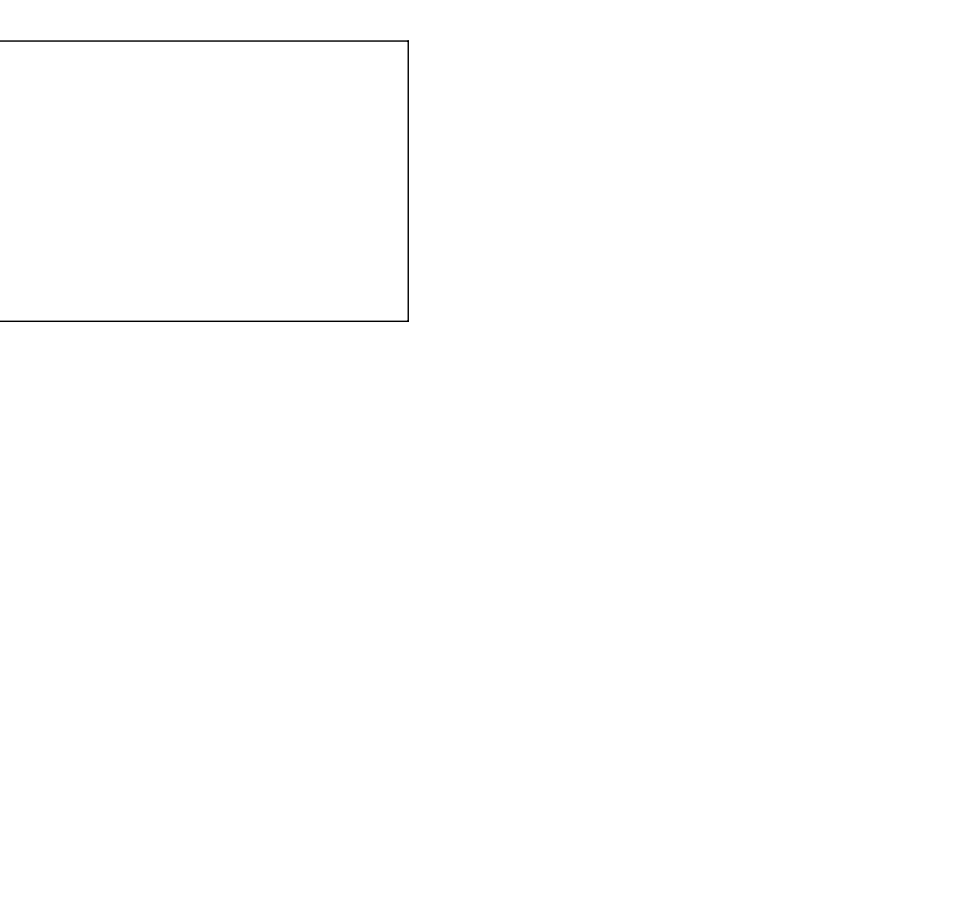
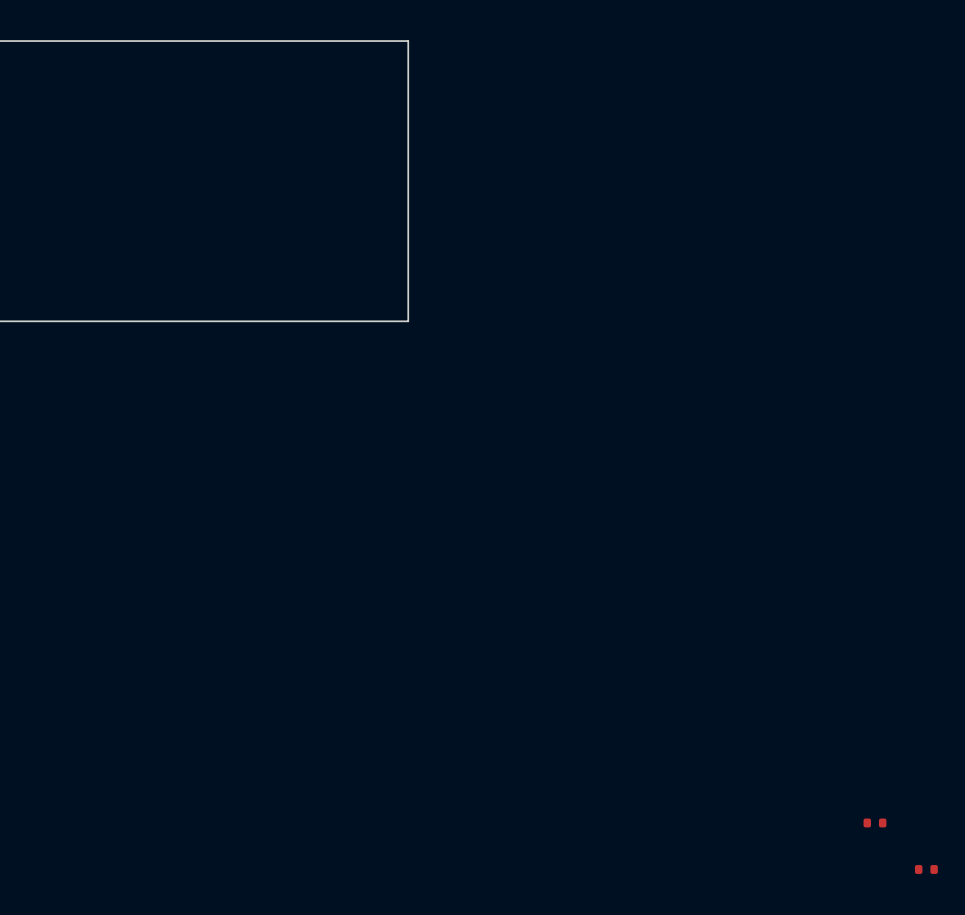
part: none -> (874, 822)
part: none -> (926, 869)

